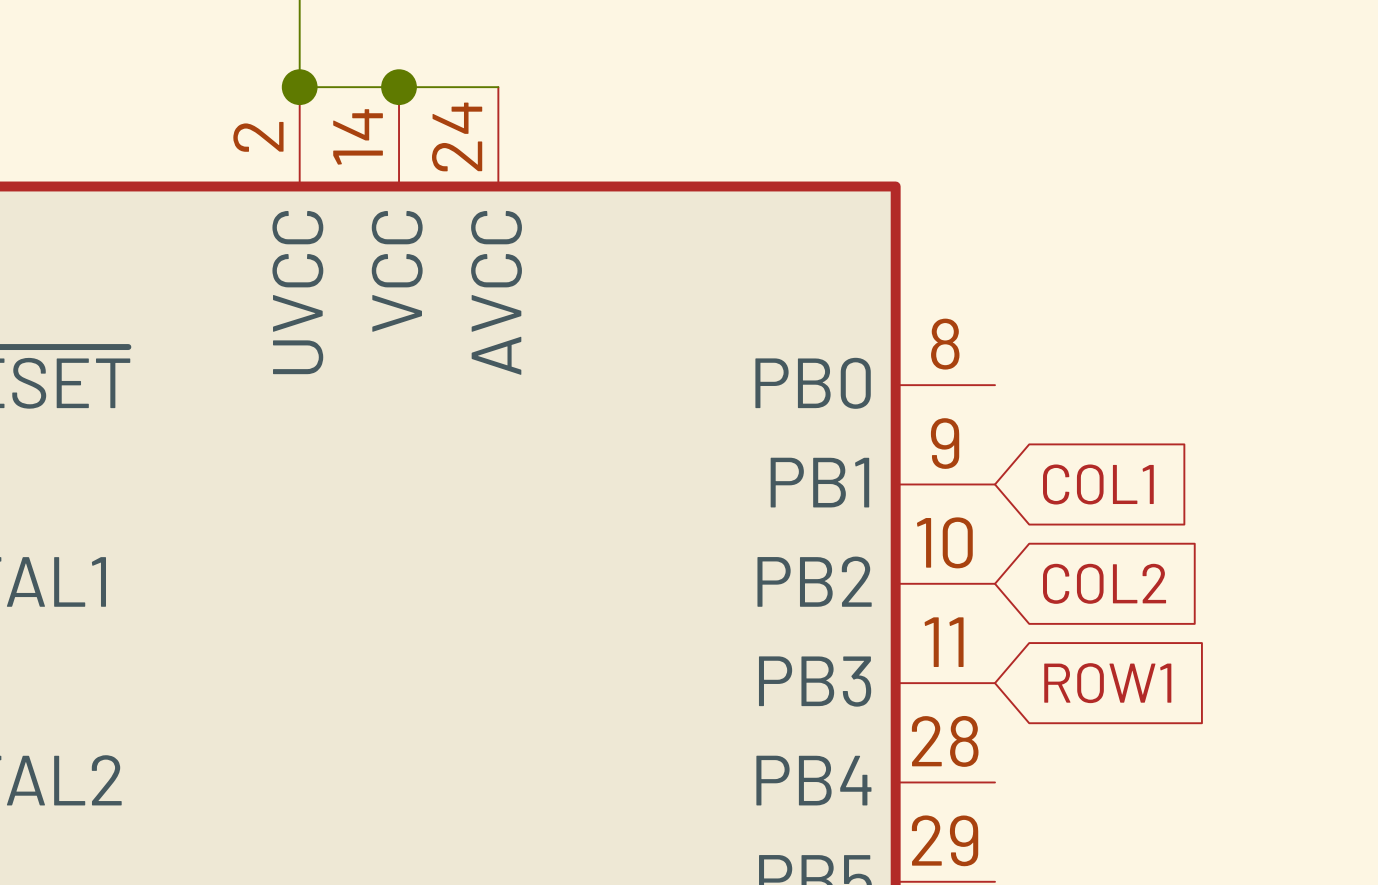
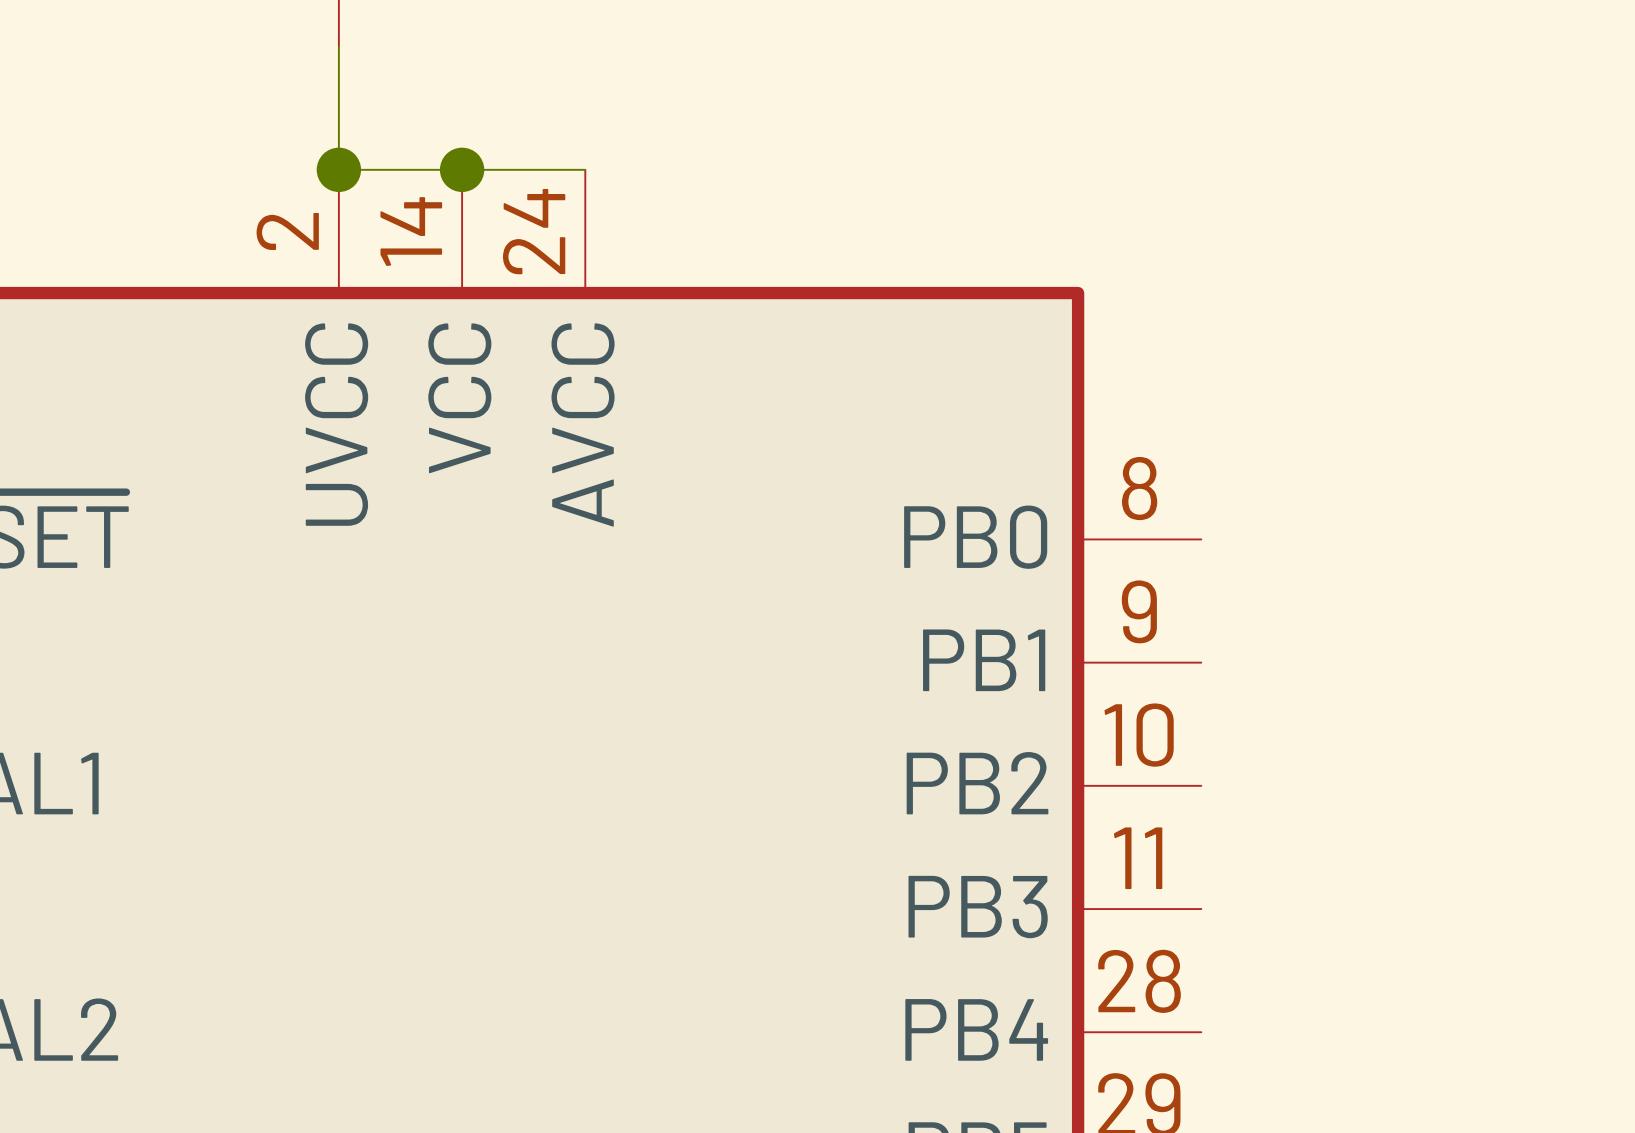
global label: COL1 (1098, 484) -> none
global label: COL2 (1104, 583) -> none
global label: ROW1 (1107, 683) -> none

